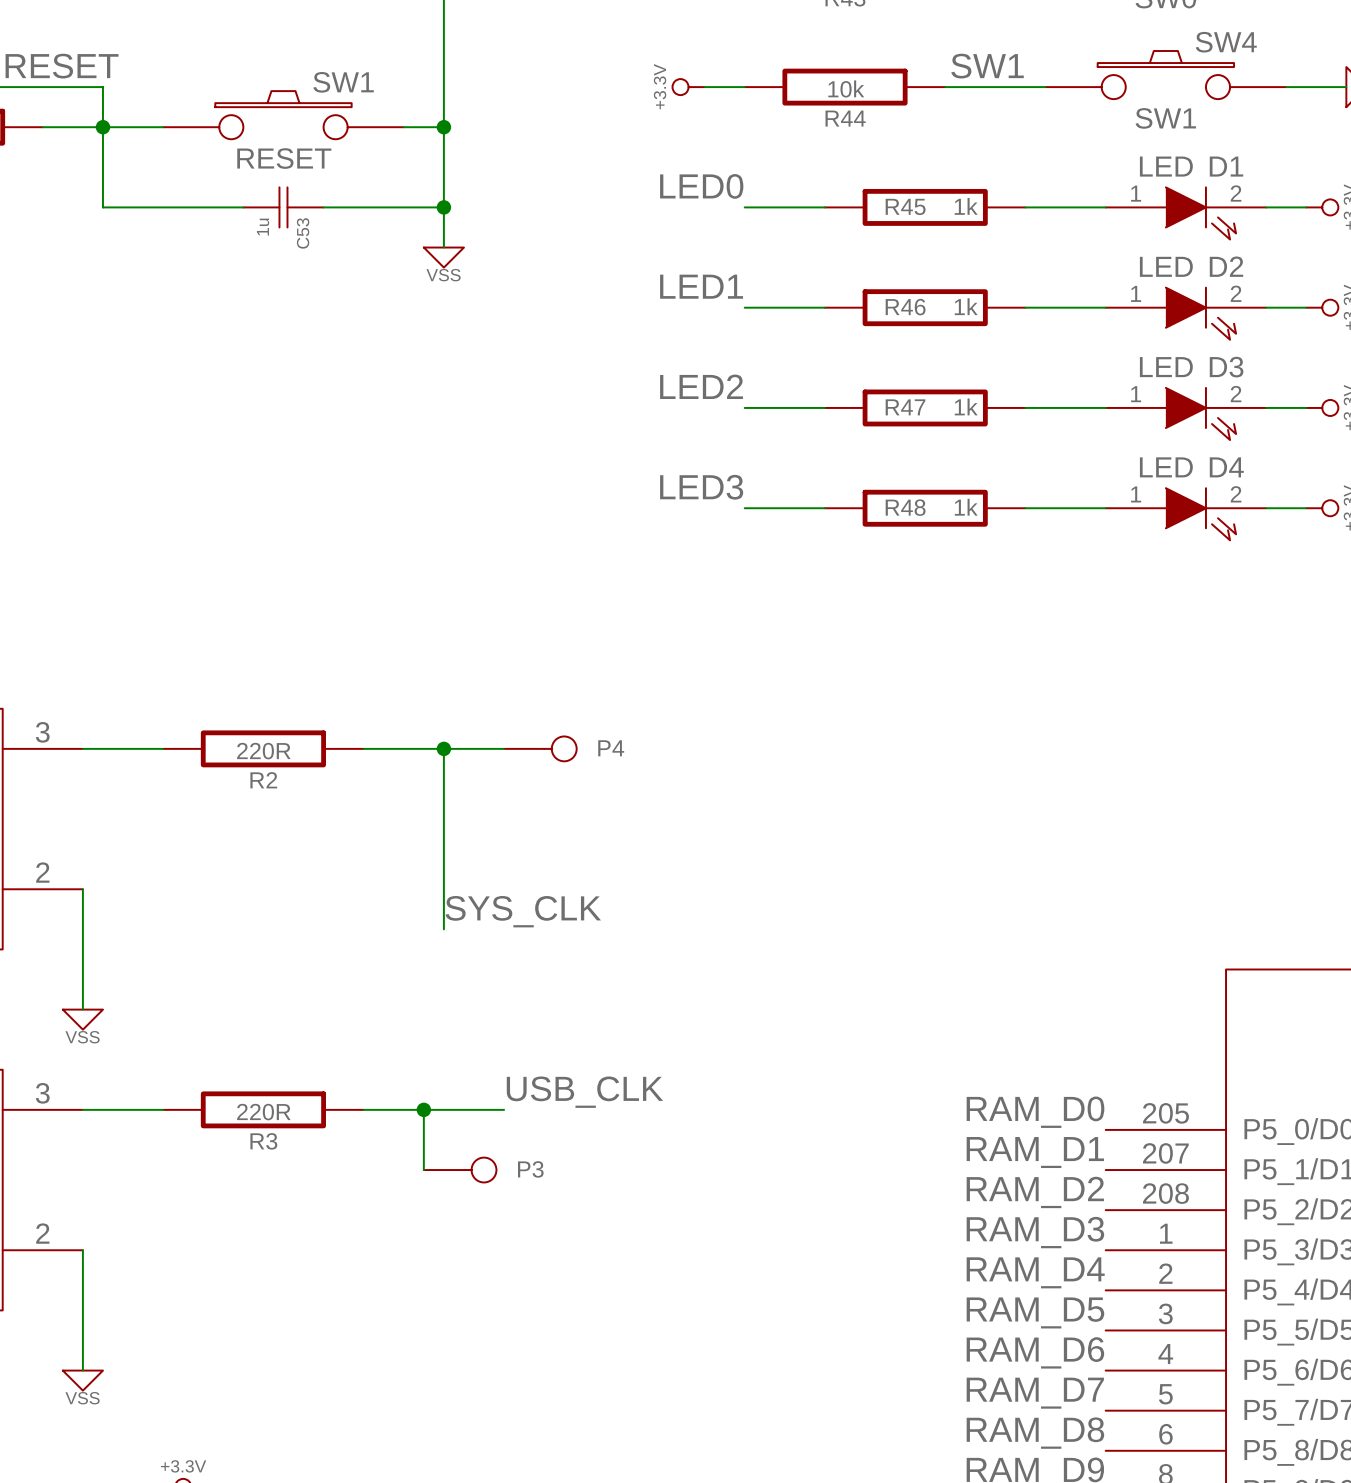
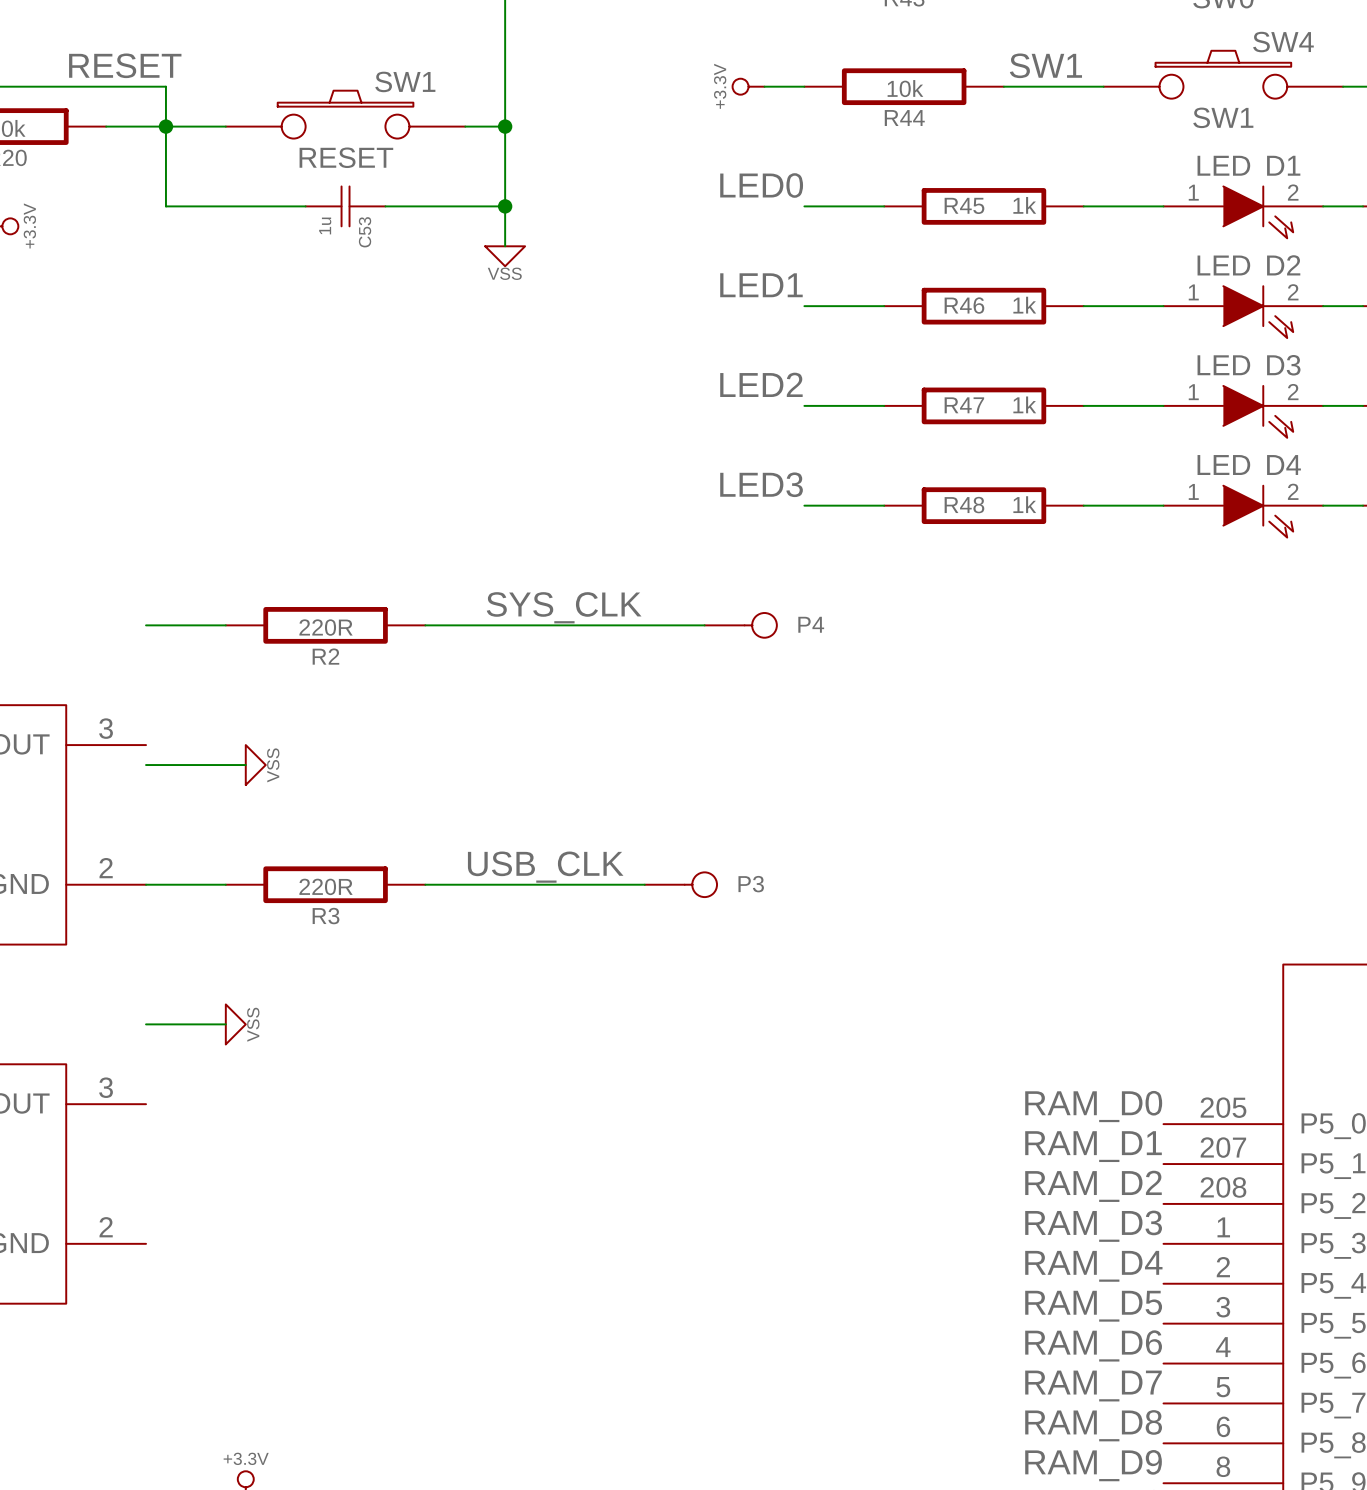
wire: none -> (425, 625) (704, 625)
wire: (82, 748) (163, 748) -> (146, 625) (225, 625)
R2 position: (263, 748) -> (325, 625)
wire: (363, 748) (504, 748) -> none
wire: (443, 748) (443, 929) -> none
junction: (443, 748) -> none
P4 position: (540, 748) -> (740, 625)
wire: none -> (146, 765) (245, 765)
power symbol: none -> VSS (255, 765)
wire: (82, 889) (82, 1009) -> (146, 884) (225, 884)
wire: none -> (425, 884) (644, 884)
label position: SYS_CLK (523, 911) -> SYS_CLK (564, 607)
power symbol rotation: 0° (82, 1019) -> 90° counterclockwise (235, 1024)
power symbol position: VSS (82, 1019) -> VSS (235, 1024)
label position: USB_CLK (584, 1092) -> USB_CLK (545, 867)
wire: (82, 1109) (163, 1109) -> (146, 1024) (225, 1024)
R3 position: (263, 1109) -> (325, 884)
wire: (363, 1109) (504, 1109) -> none
wire: (423, 1109) (423, 1170) -> none
junction: (423, 1109) -> none
P3 position: (460, 1170) -> (680, 884)
wire: (82, 1250) (82, 1370) -> none
power symbol: VSS (82, 1380) -> none

